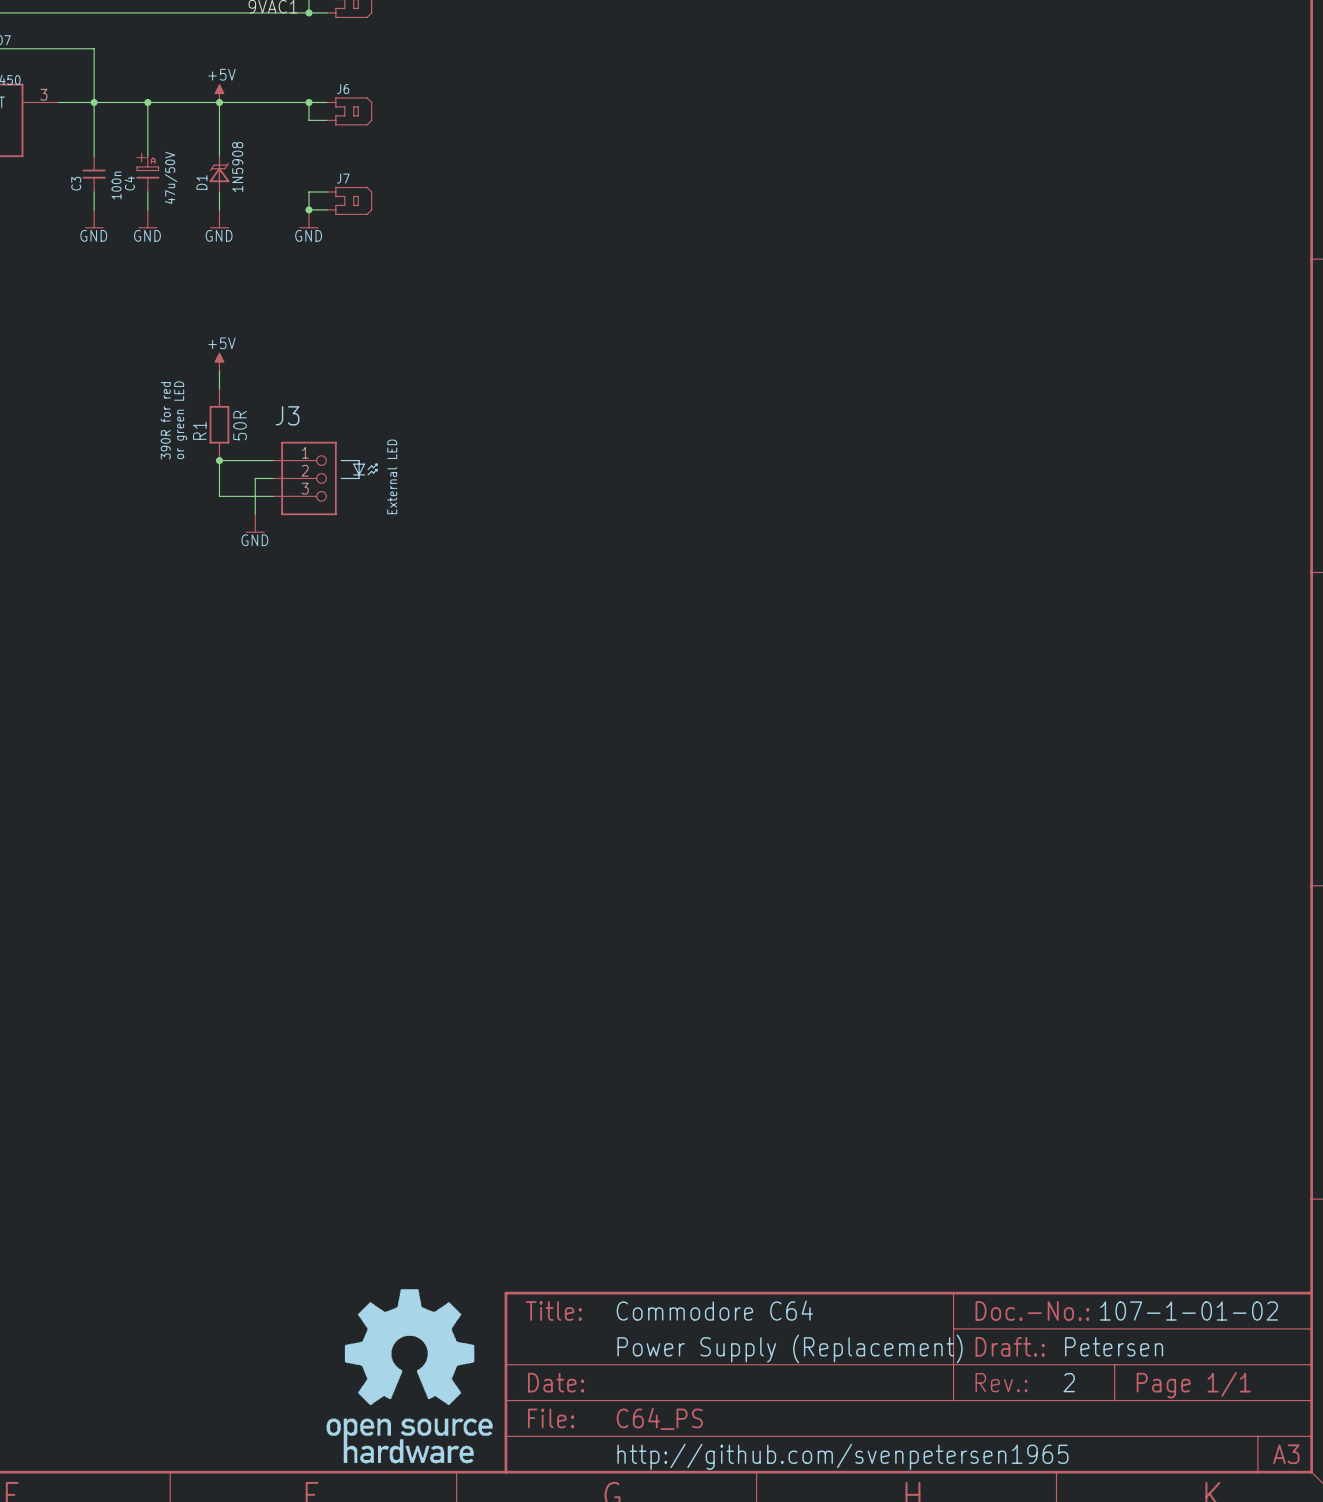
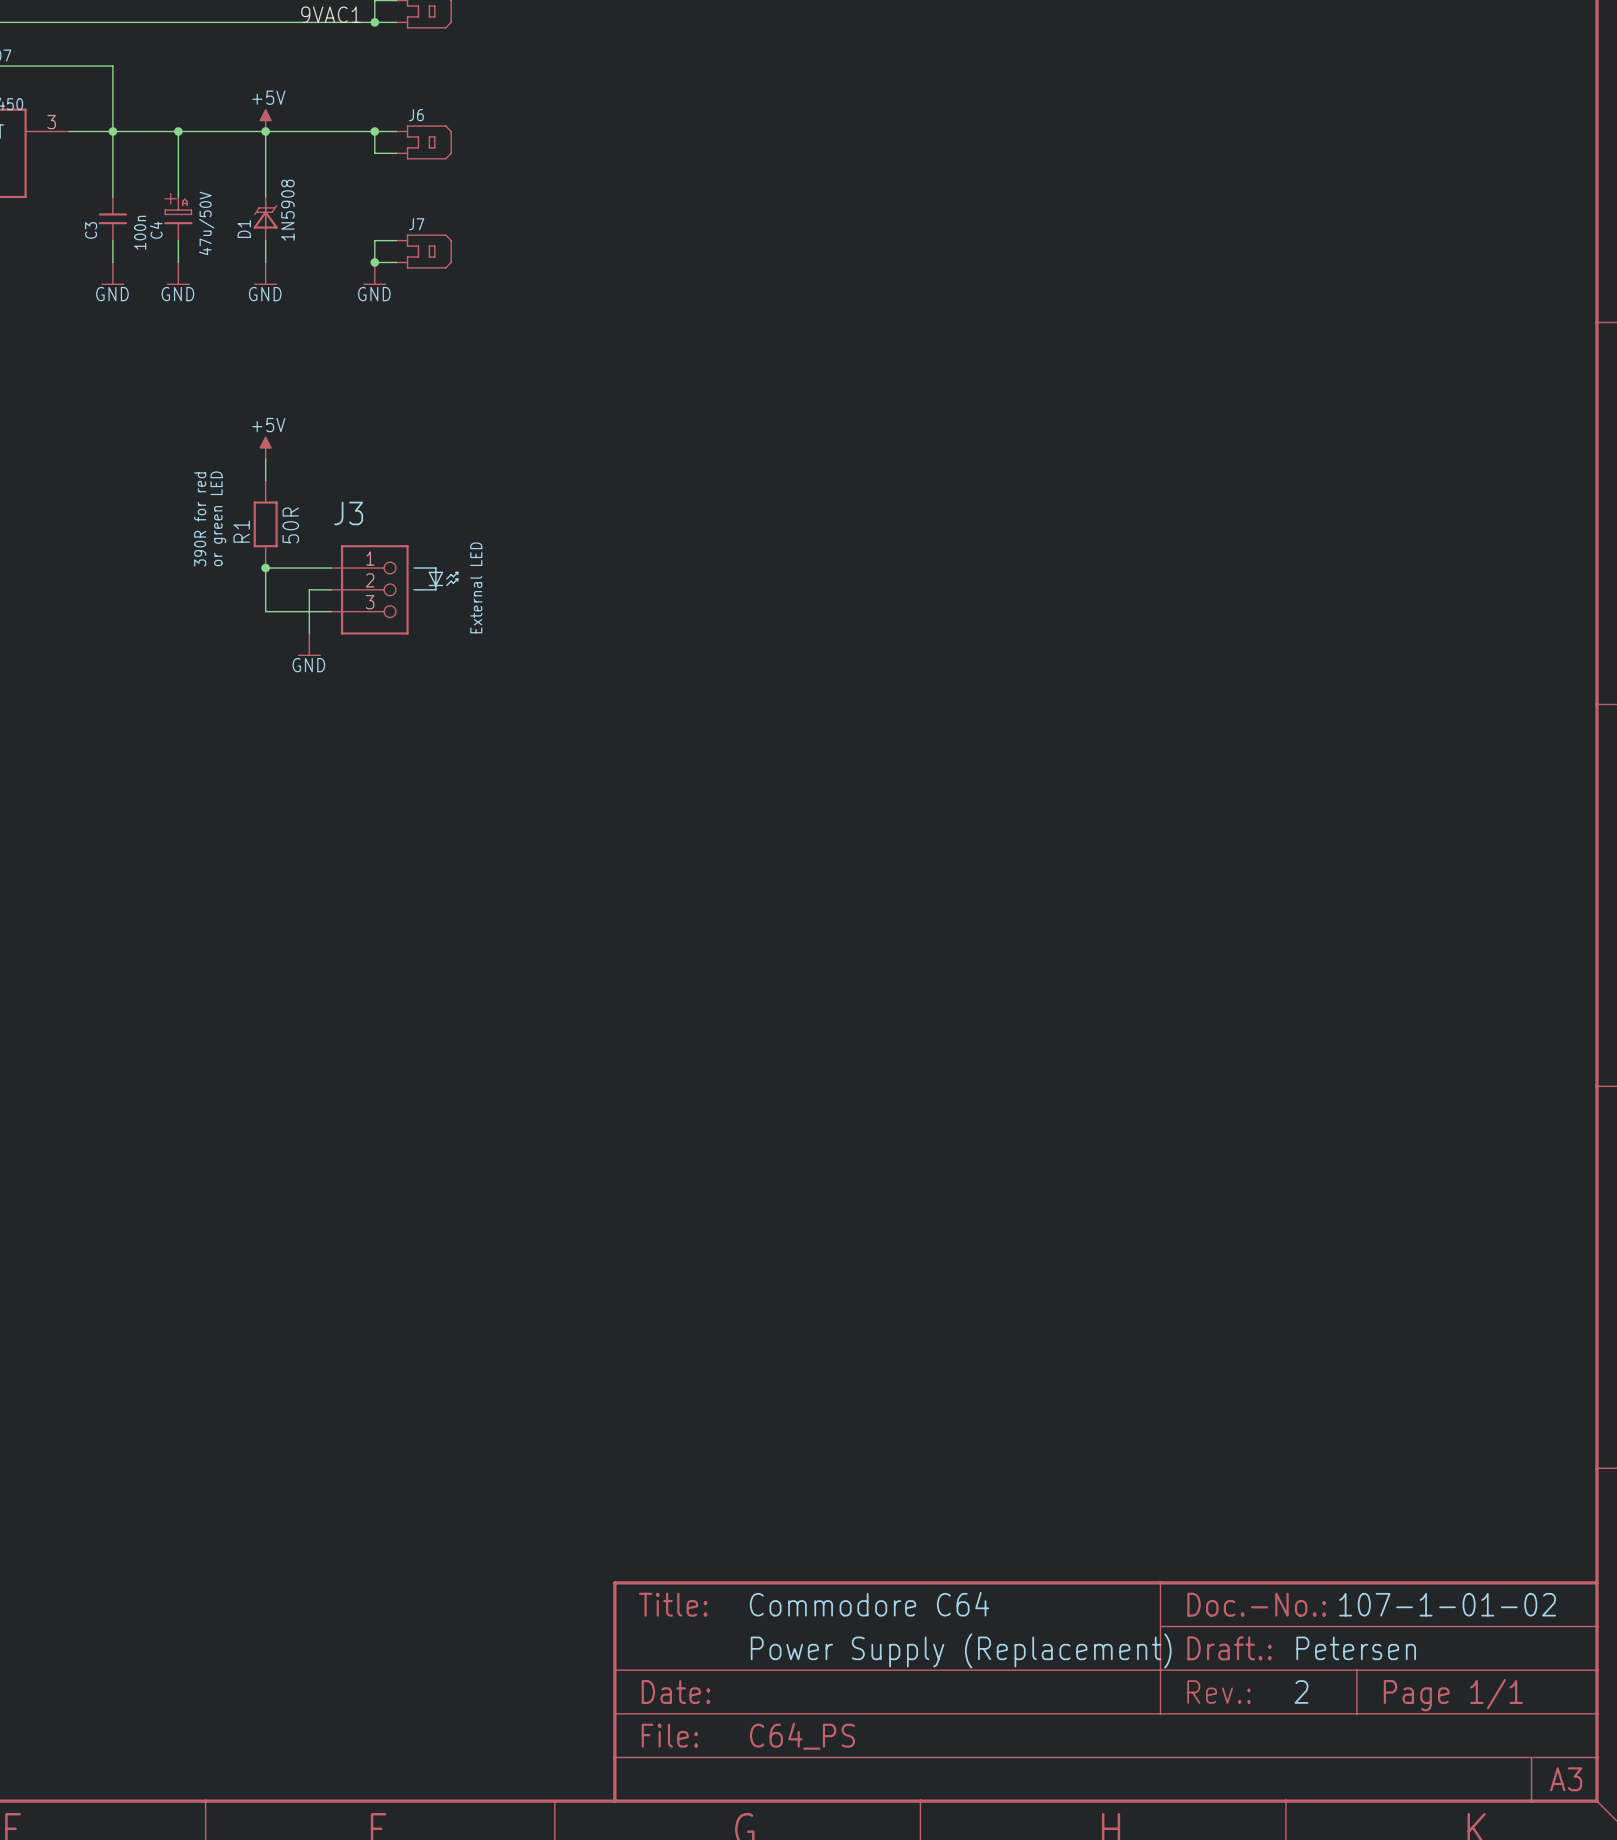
part: (409, 1376) -> none
text: http://github.com/svenpetersen1965 (842, 1456) -> none

